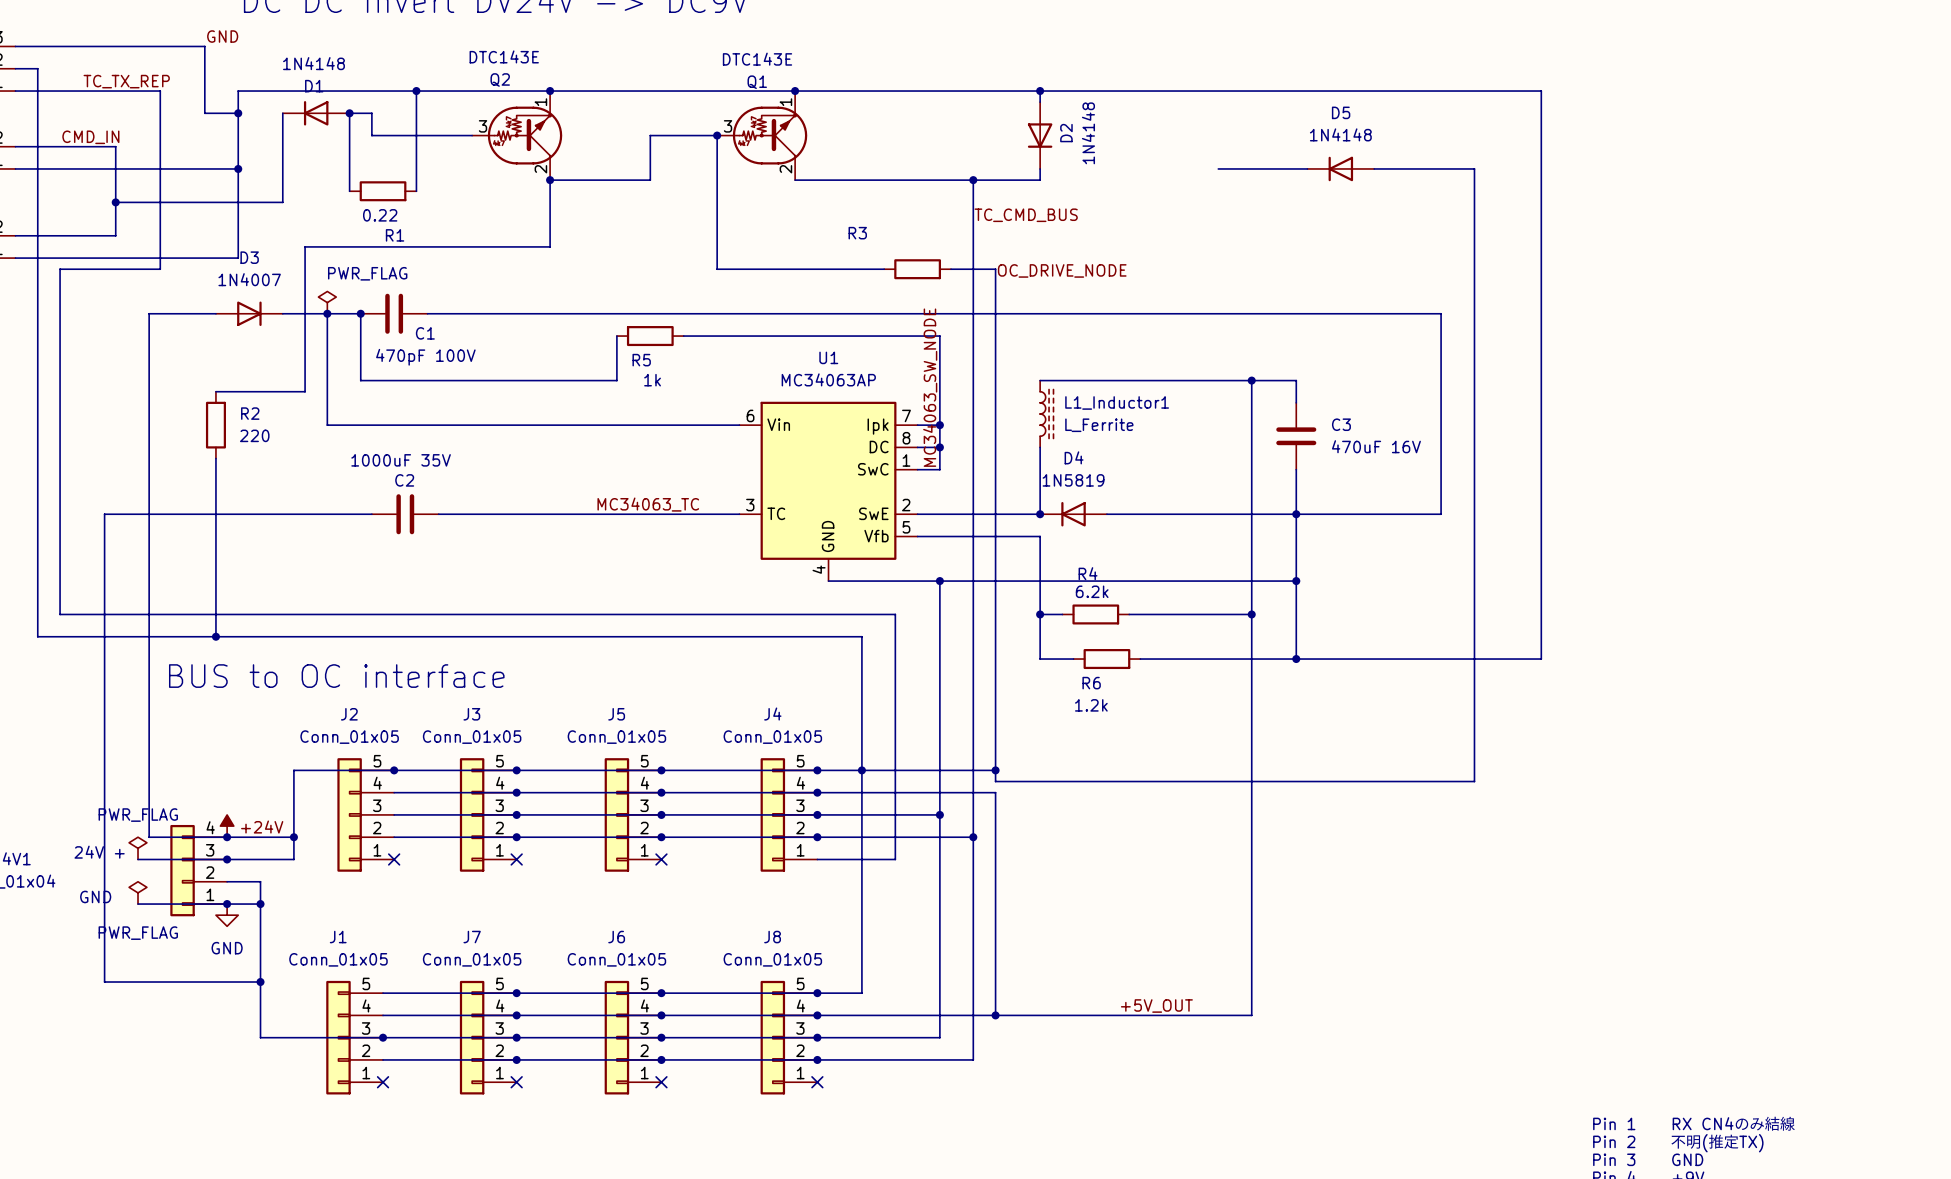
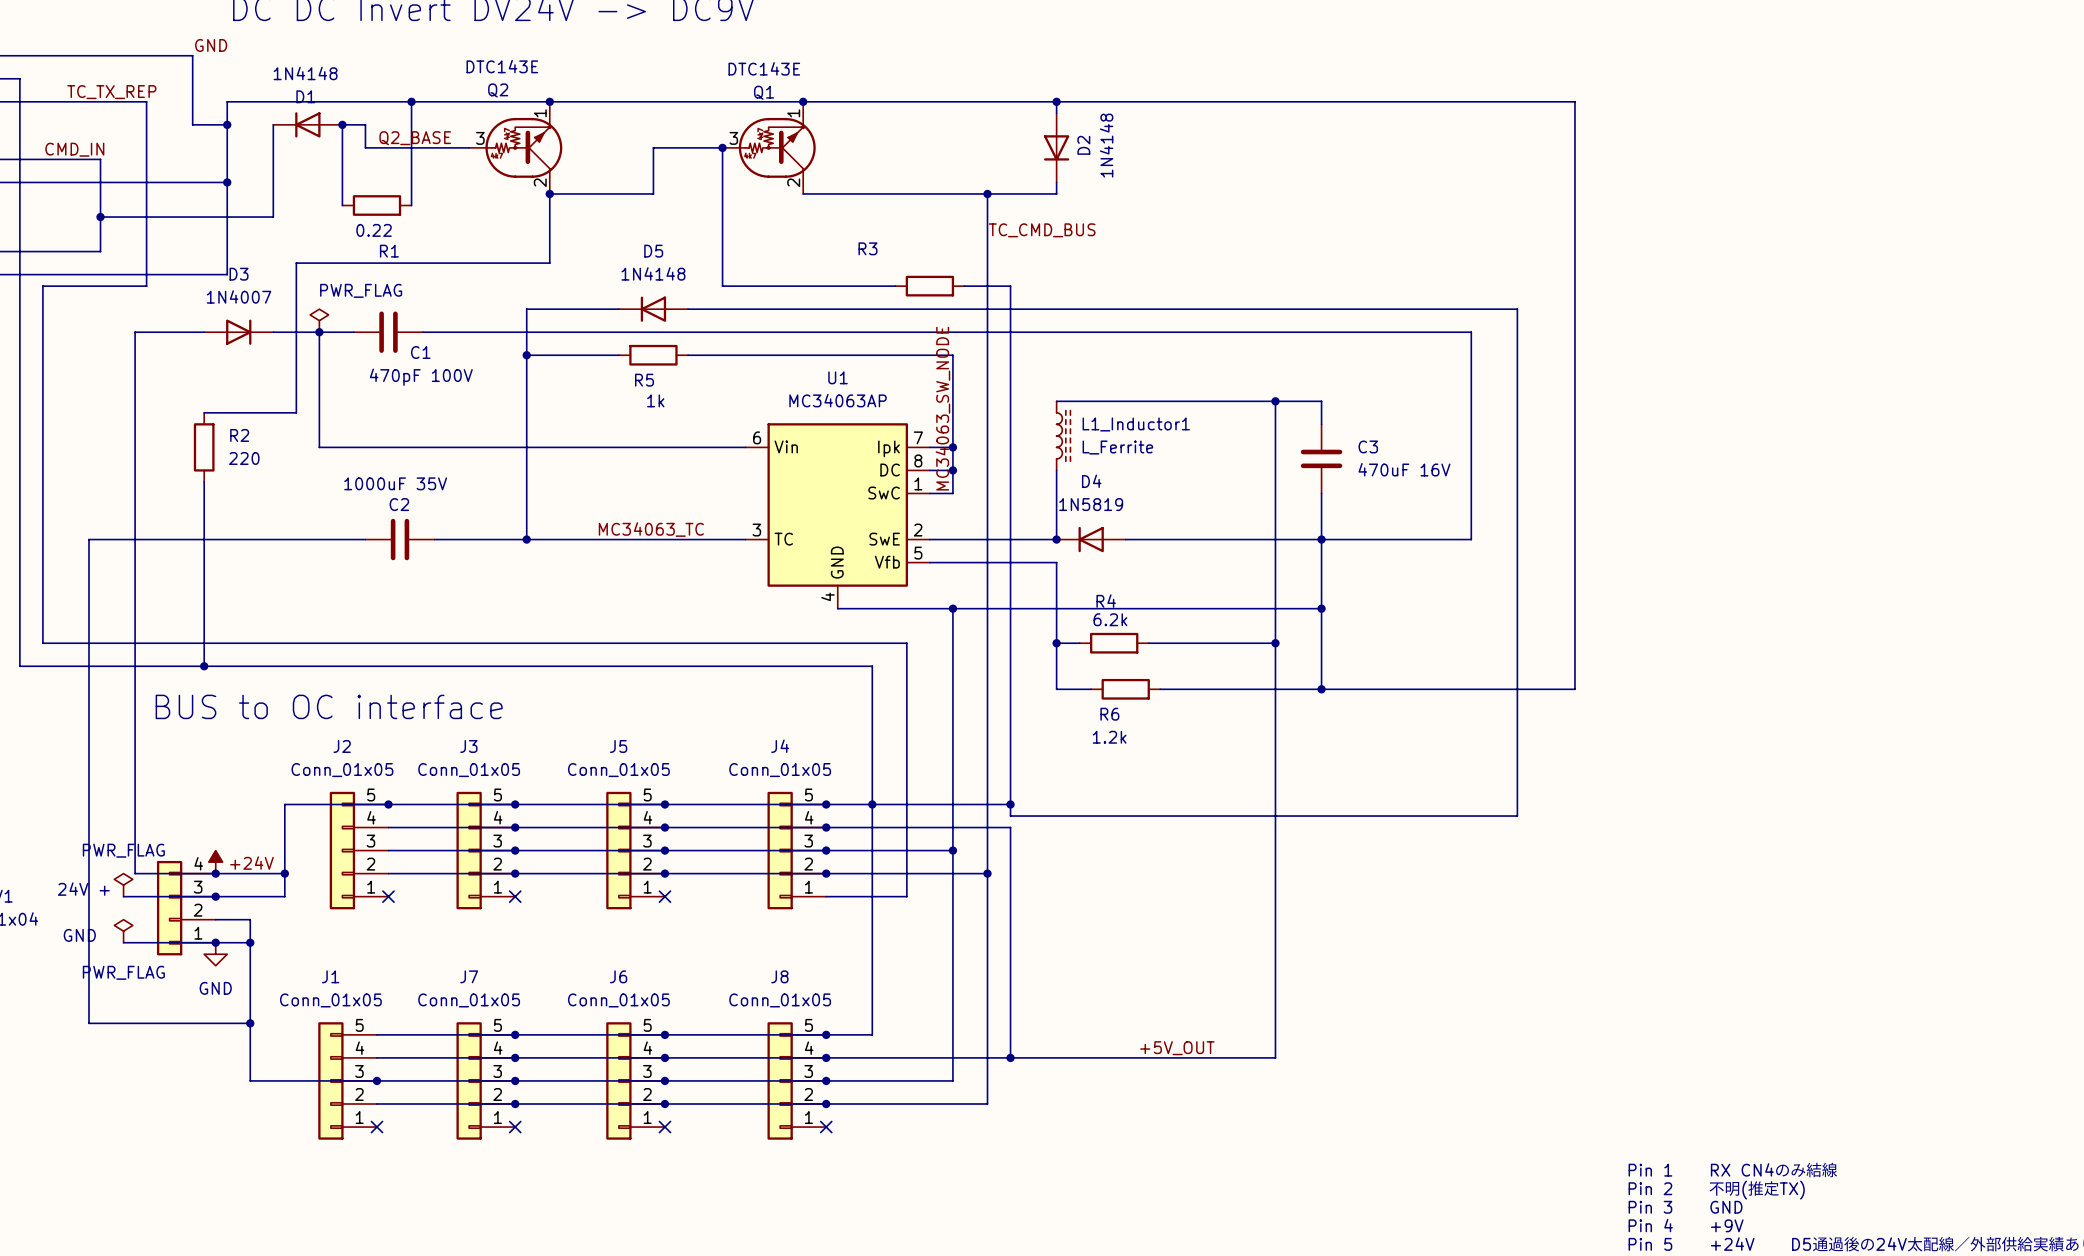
label: none -> Q2_BASE (415, 138)
wire: (1218, 168) (1307, 168) -> none
D5 position: (1340, 168) -> (653, 309)
wire: (1374, 168) (1474, 168) (1474, 781) -> (688, 309) (1517, 309) (1517, 816) (1505, 816)
label: OC_DRIVE_NODE (1062, 270) -> none
wire: none -> (618, 309) (526, 309) (526, 539)
wire: (360, 313) (360, 380) (616, 380) (616, 336) -> (526, 355) (618, 355)
junction: (360, 313) -> none
junction: none -> (526, 355)
junction: none -> (526, 539)

